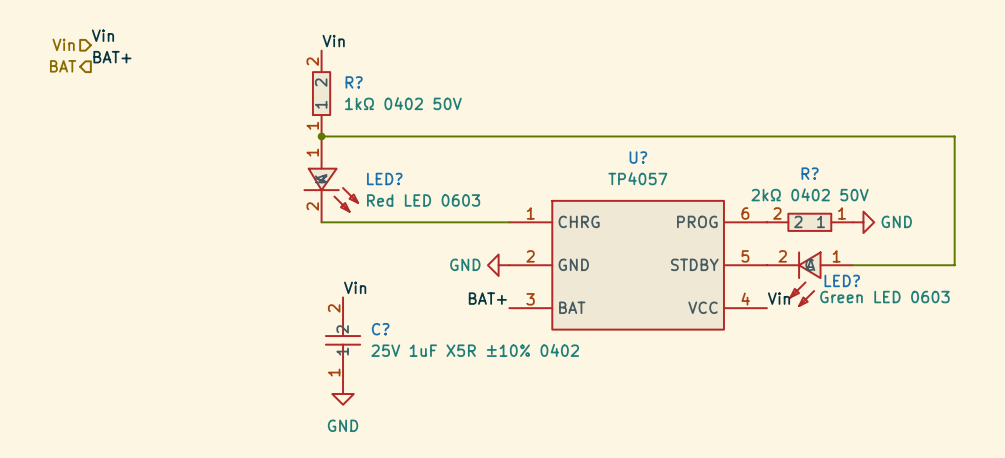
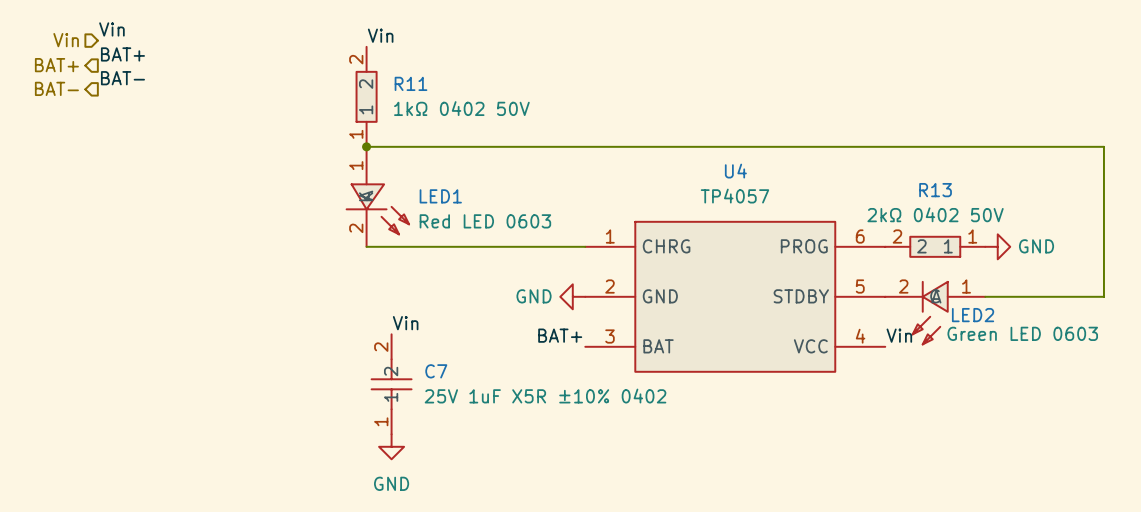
hierarchical label: BAT (63, 66) -> BAT+ (56, 65)
label: none -> BAT- (122, 78)
R? name: R? (354, 82) -> R11 (411, 83)
hierarchical label: none -> BAT- (56, 88)
U? name: U? (638, 157) -> U4 (735, 171)
R? name: R? (810, 173) -> R13 (935, 190)
LED? name: LED? (384, 179) -> LED1 (440, 196)
LED? name: LED? (842, 280) -> LED2 (973, 315)
C? name: C? (380, 329) -> C7 (436, 371)

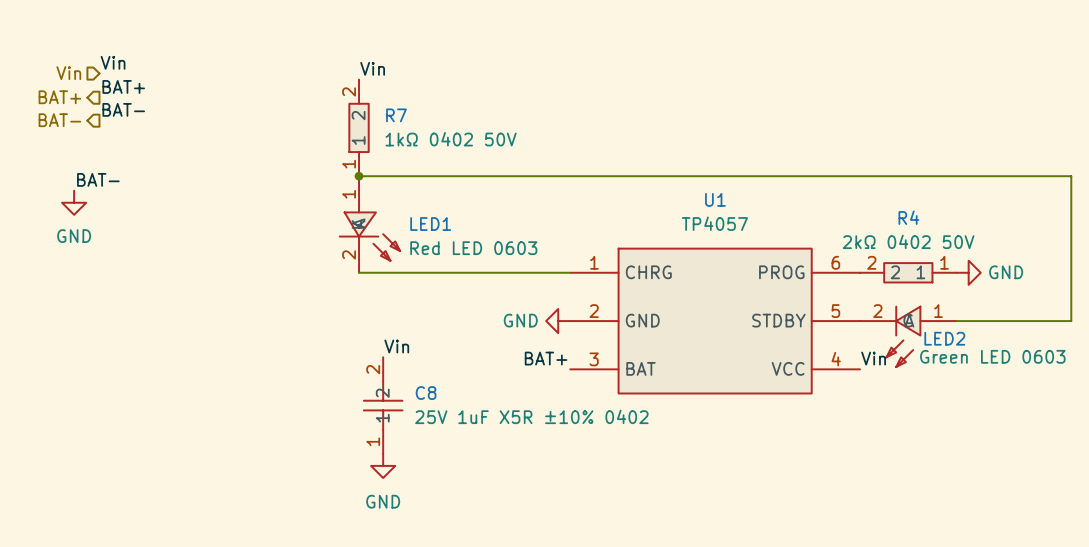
R11 name: R11 (411, 83) -> R7 (396, 115)
label: none -> BAT- (98, 179)
U4 name: U4 (735, 171) -> U1 (715, 199)
power symbol: none -> GND (74, 202)
R13 name: R13 (935, 190) -> R4 (908, 217)
C7 name: C7 (436, 371) -> C8 (426, 393)

